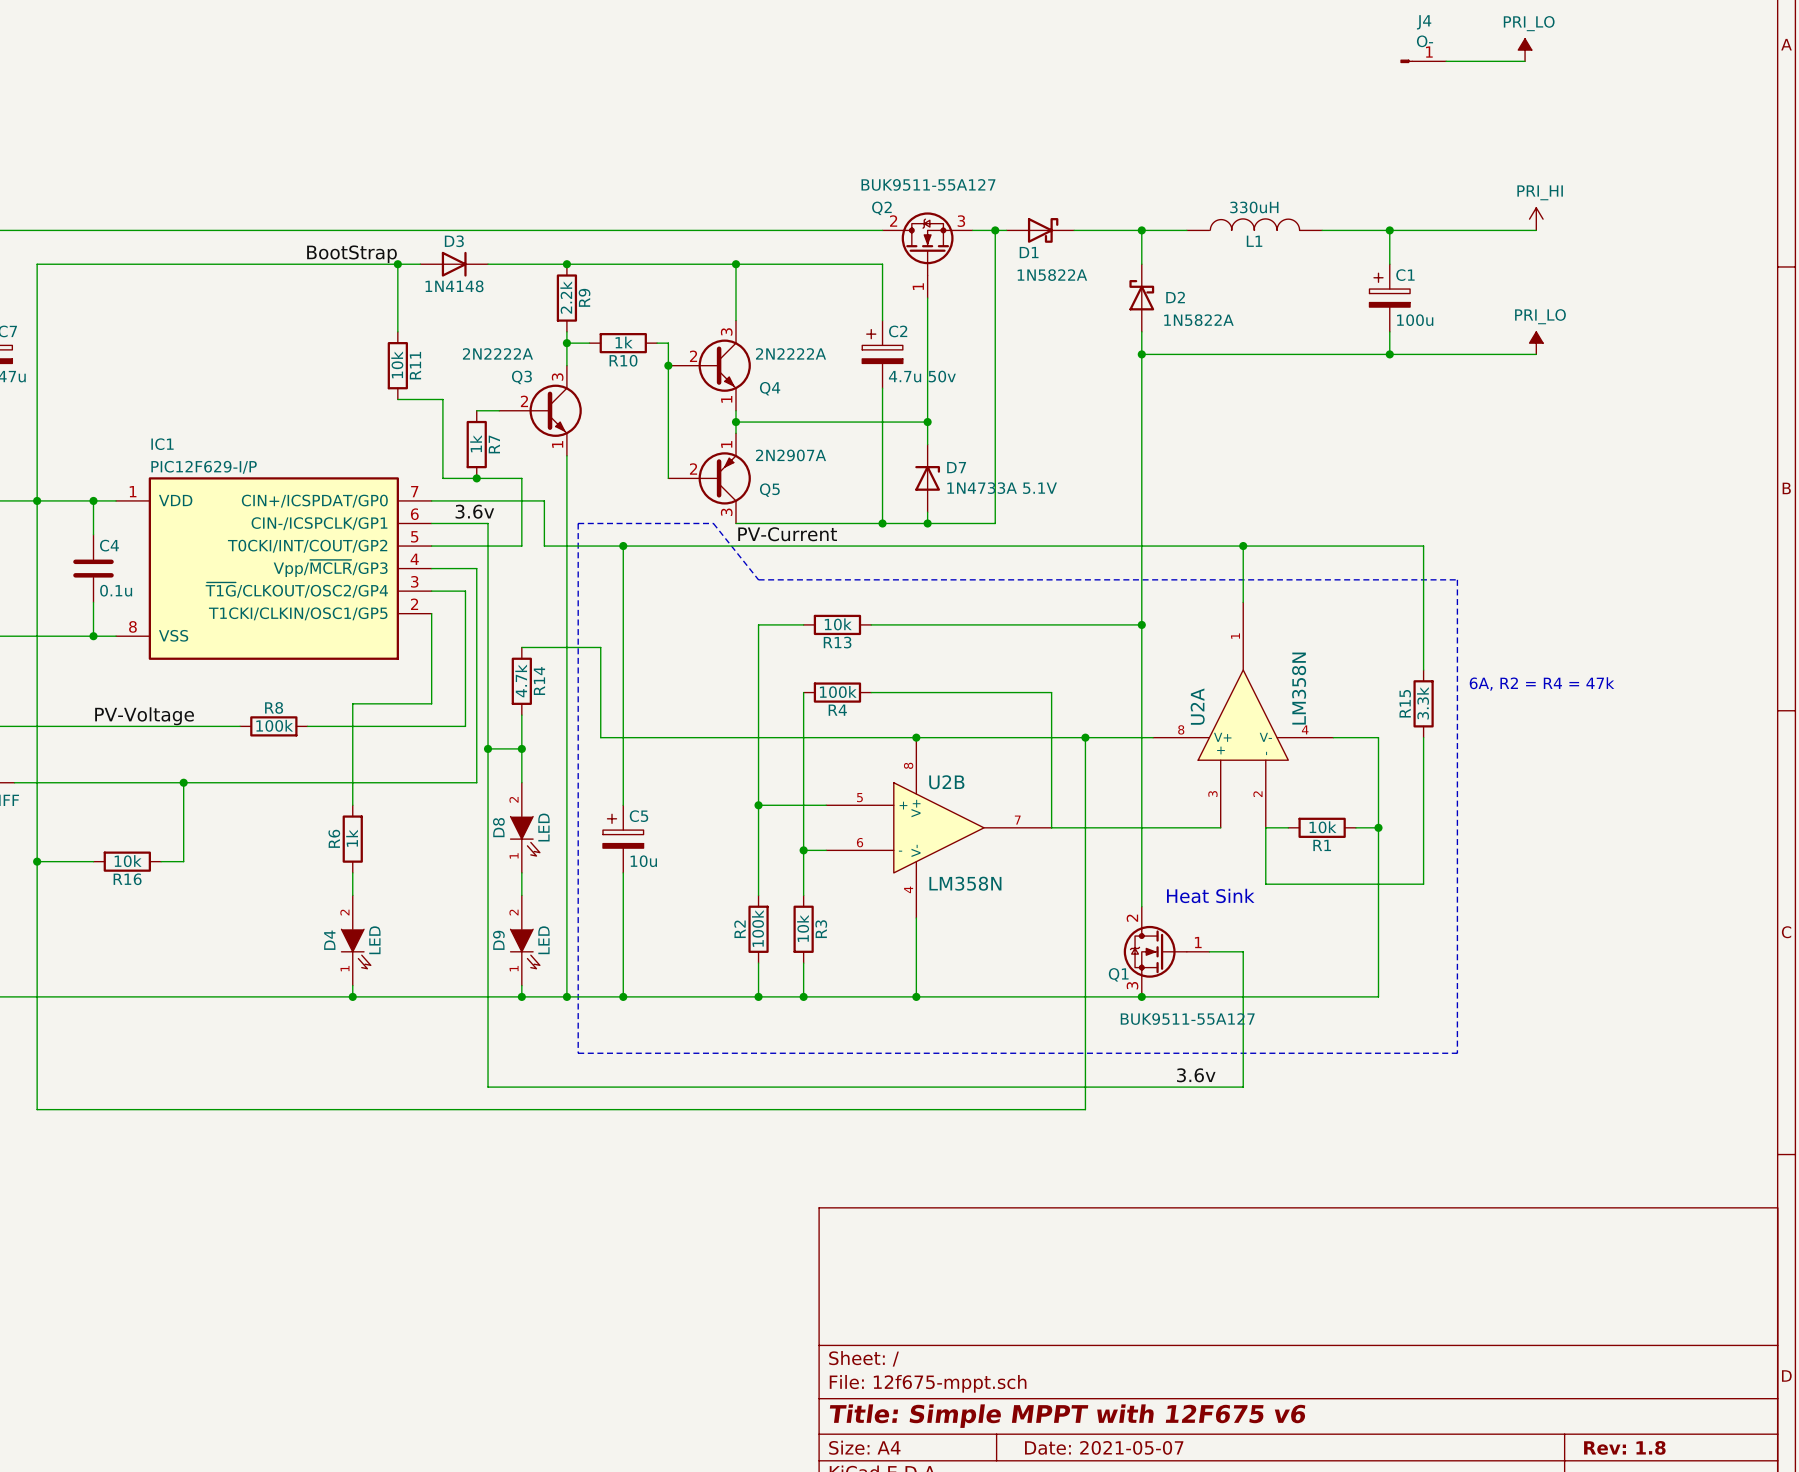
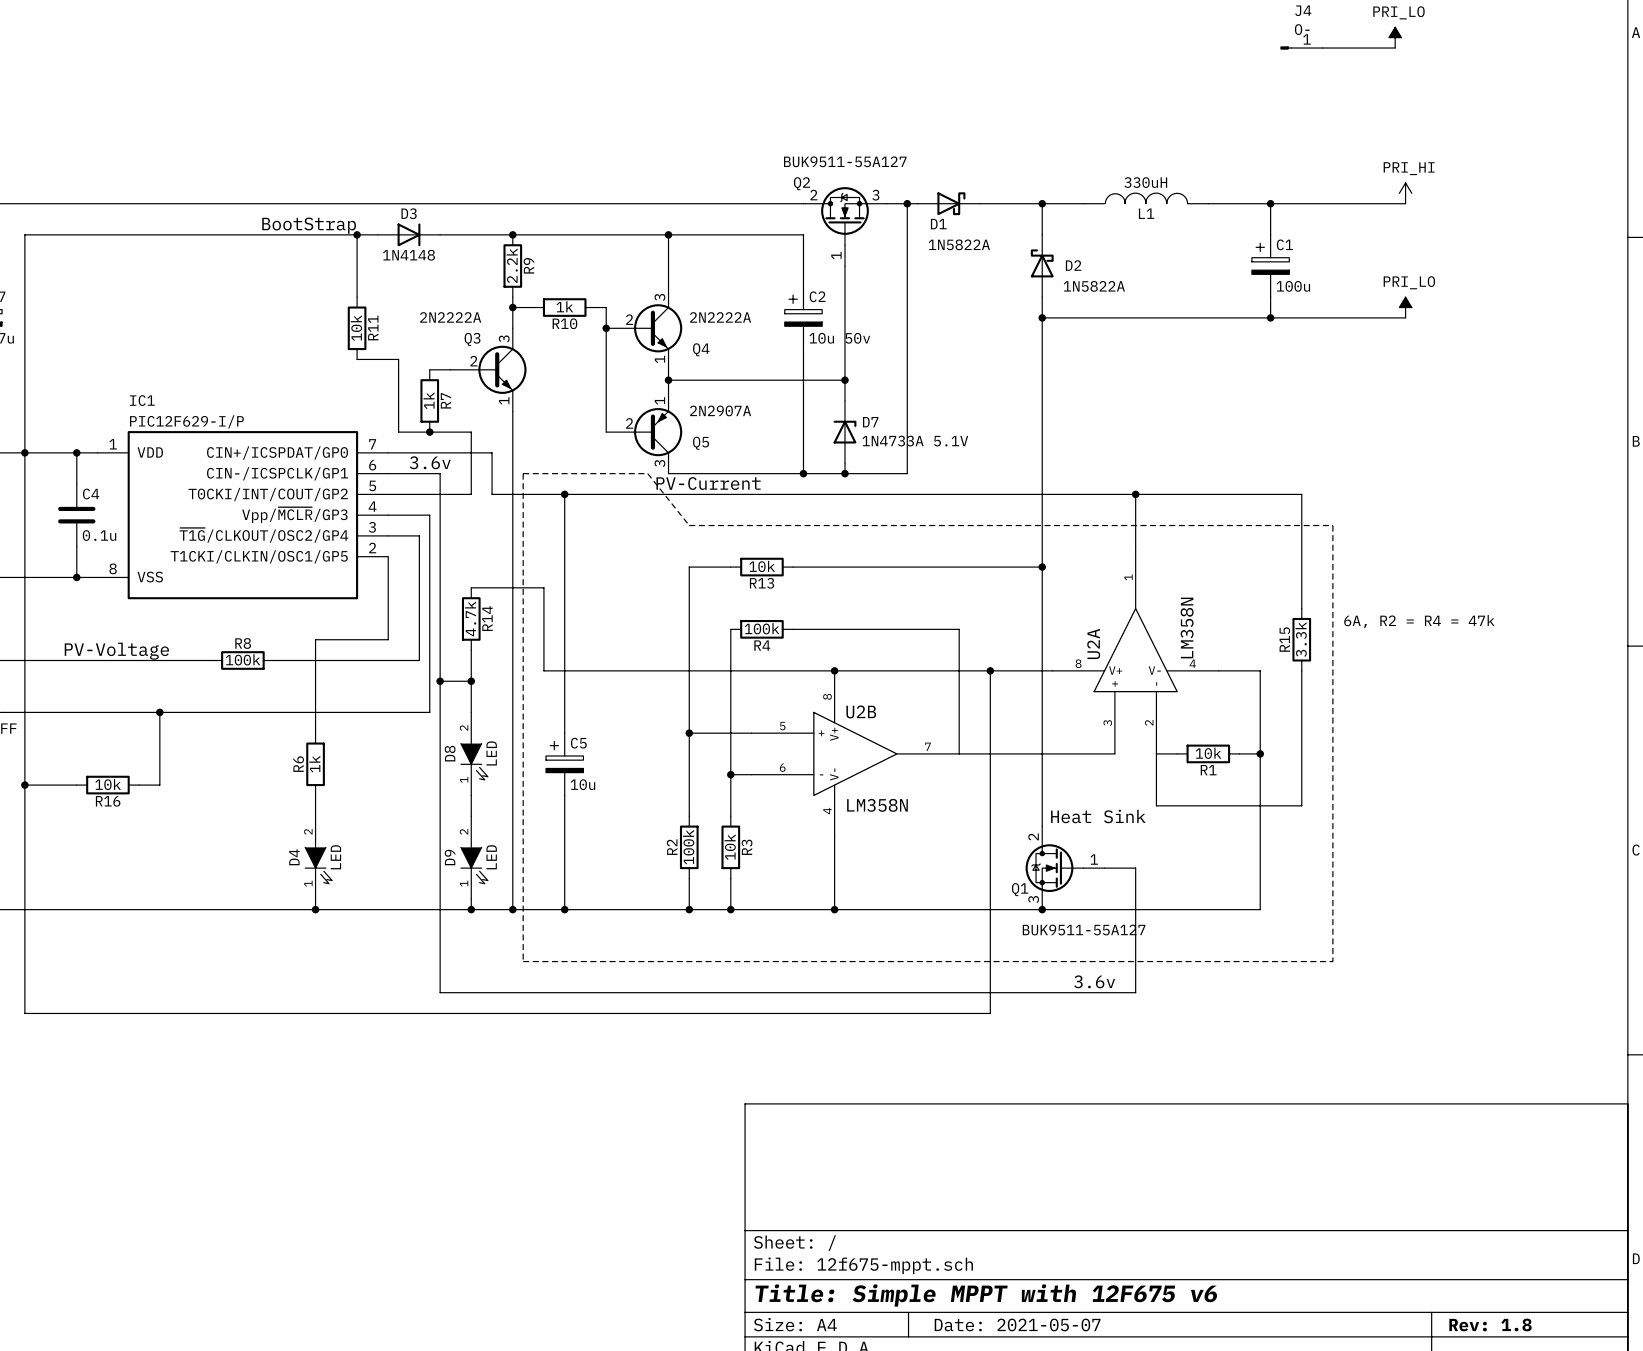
C2 value: 4.7u 50v (922, 376) -> 10u 50v (839, 338)

